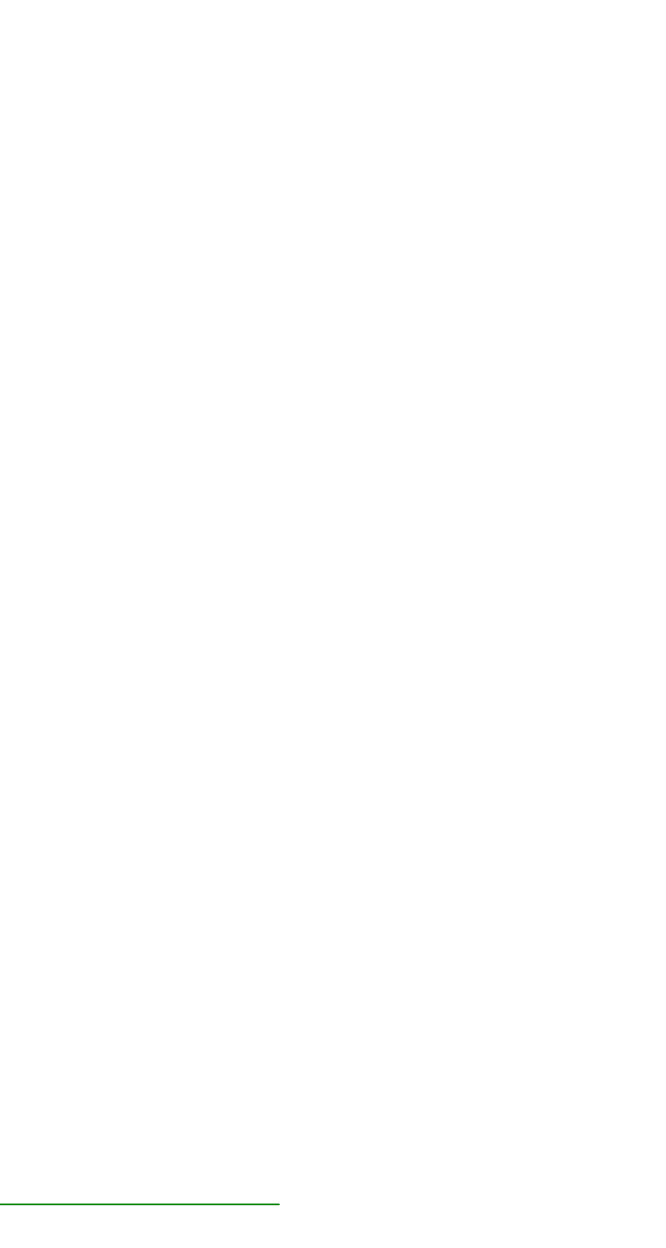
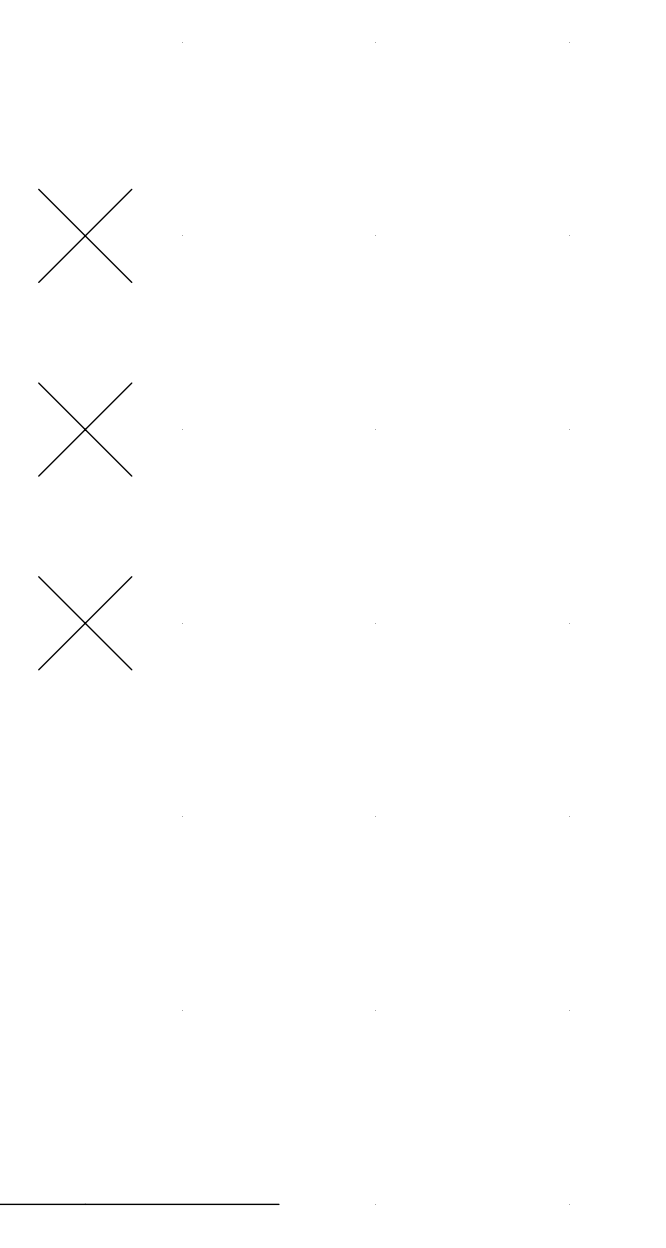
no-connect mark: none -> (85, 235)
no-connect mark: none -> (85, 429)
no-connect mark: none -> (85, 623)

